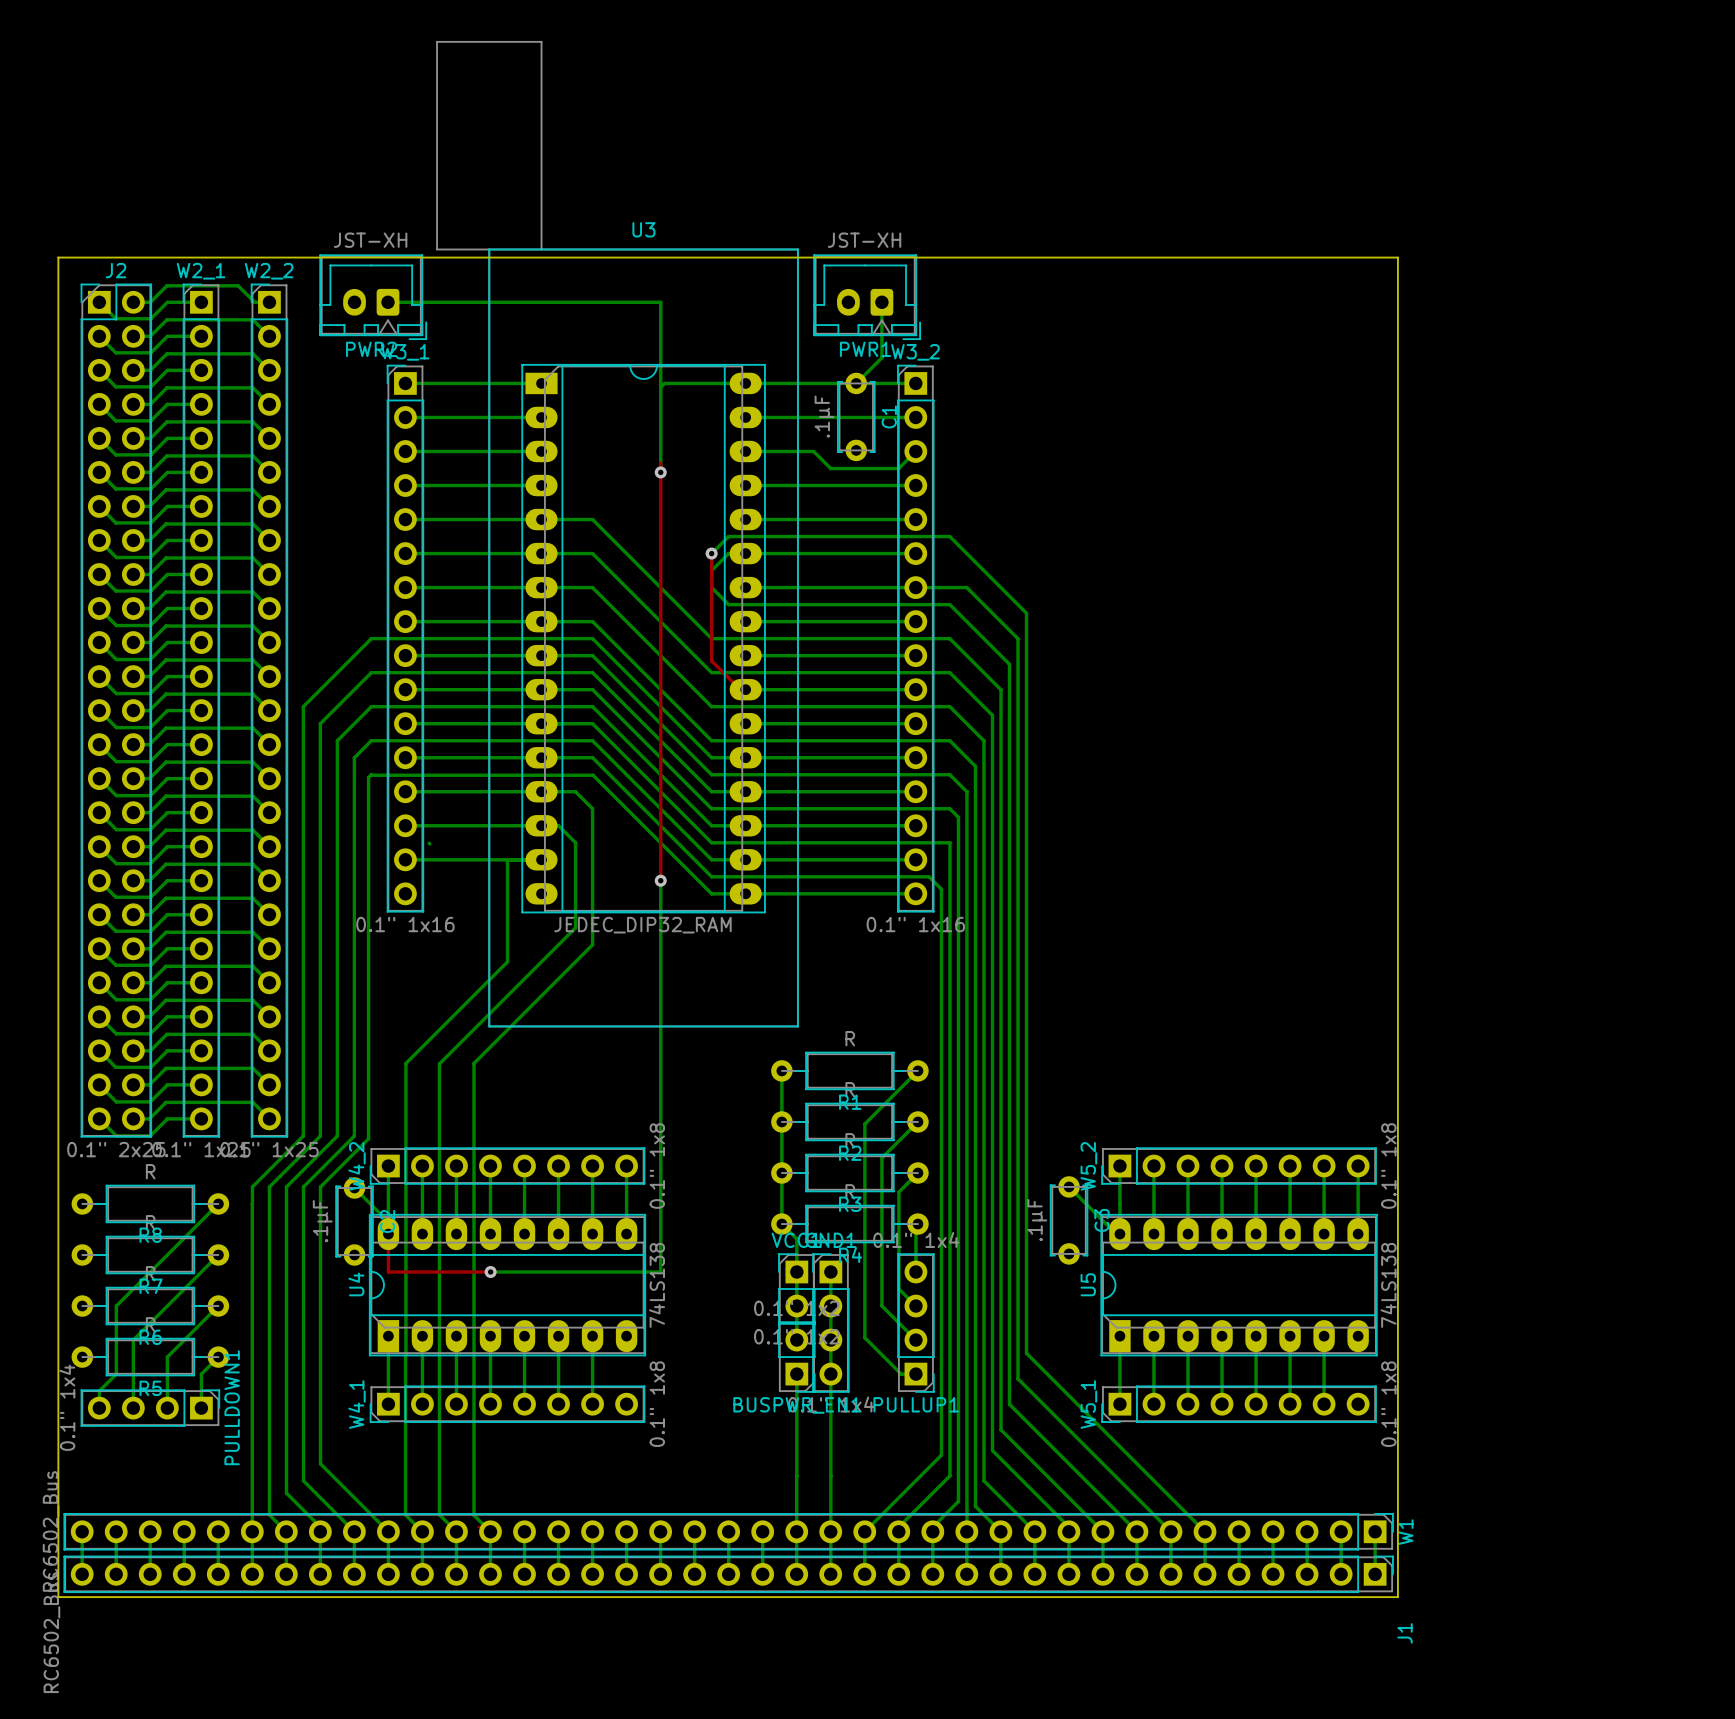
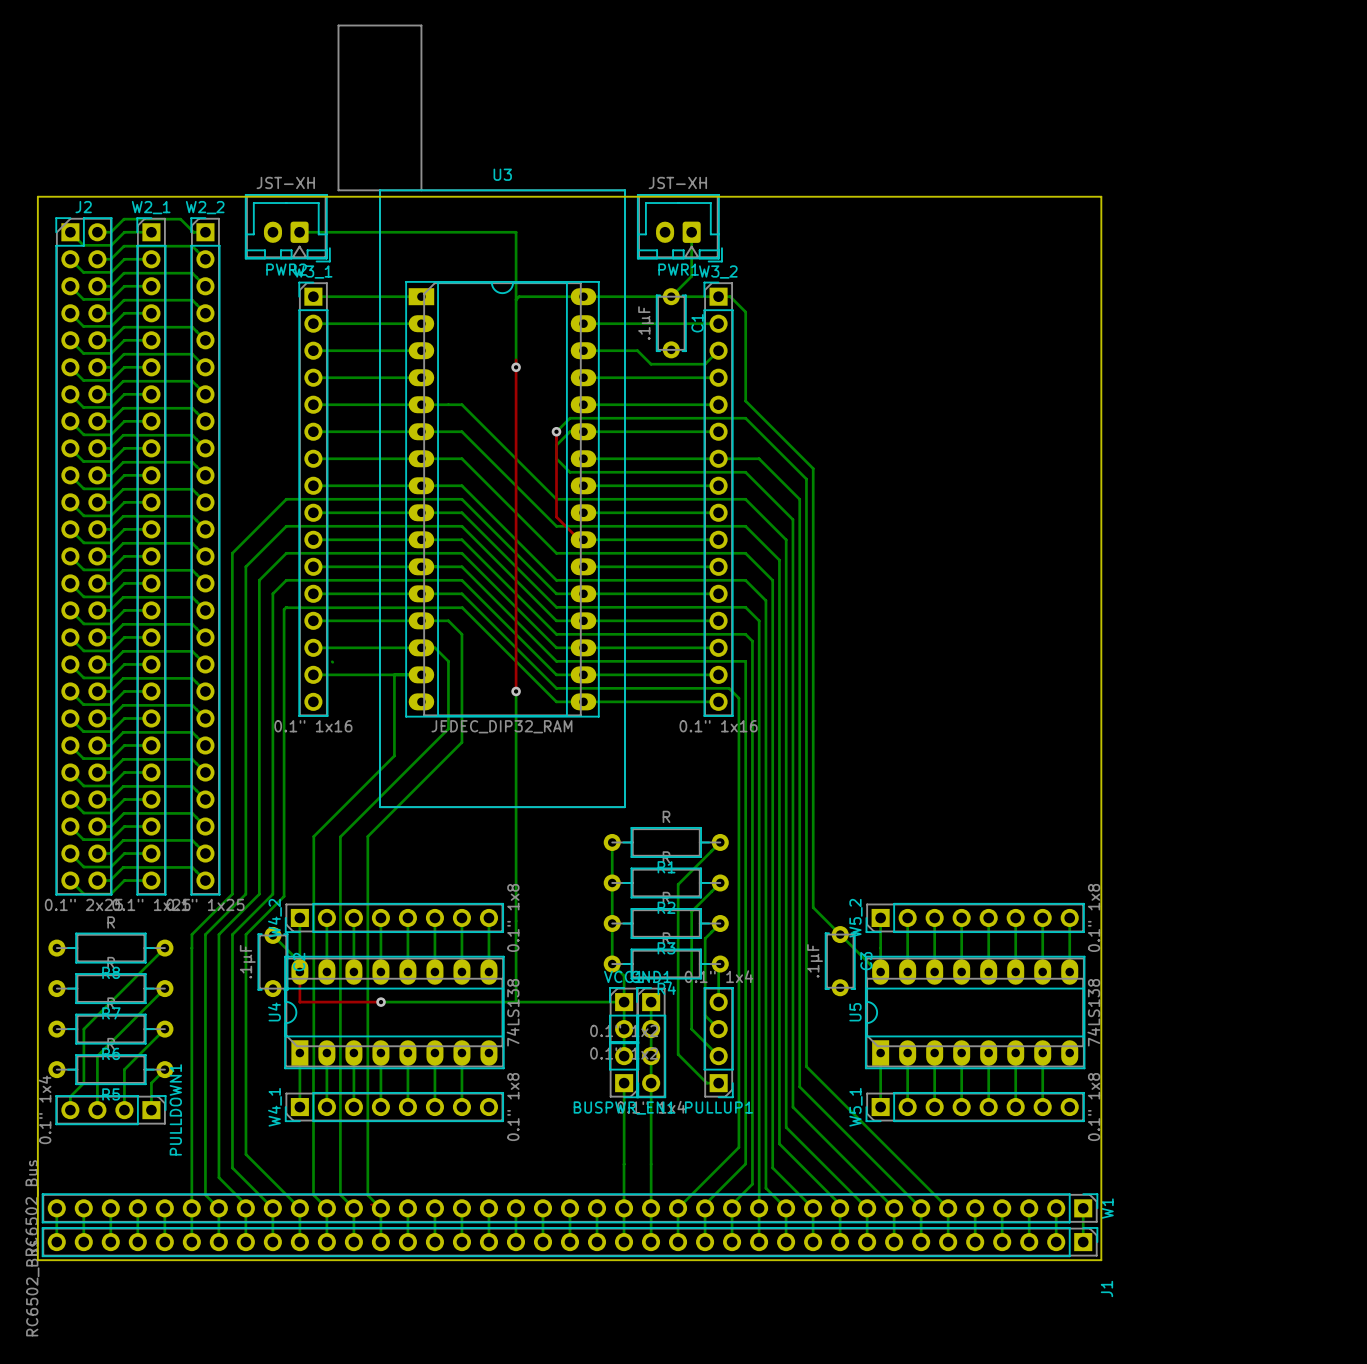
bottom track: none -> (718, 296) (730, 296) (745, 312) (745, 401) (813, 468) (813, 907) (840, 934)
bottom track: none -> (516, 1002) (624, 1002)

